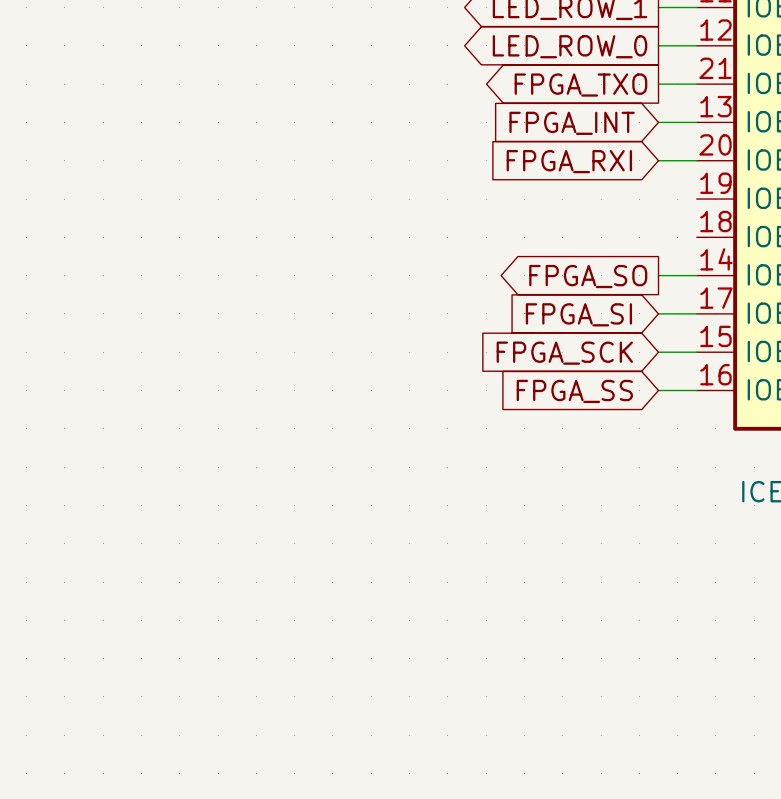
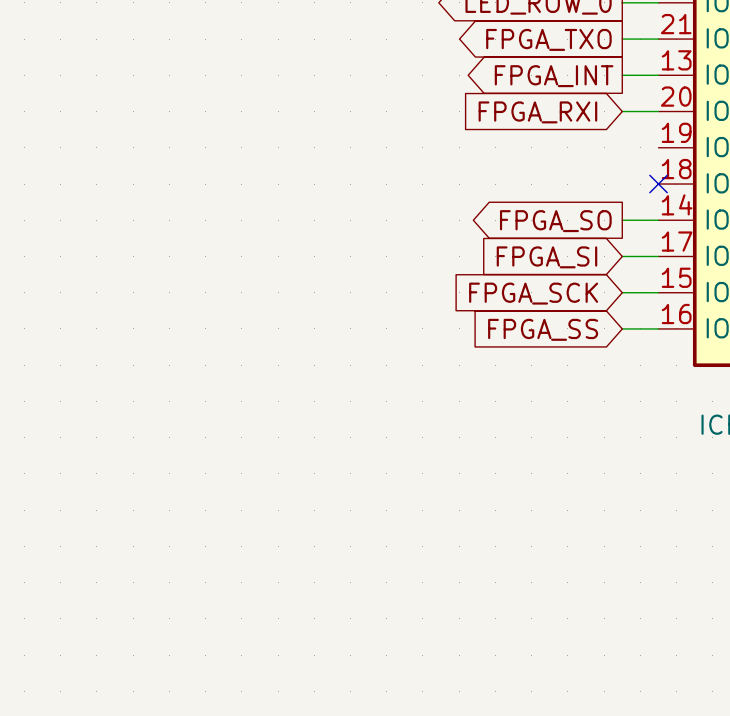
global label shape: input (572, 123) -> output (554, 76)
no-connect mark: none -> (658, 184)

